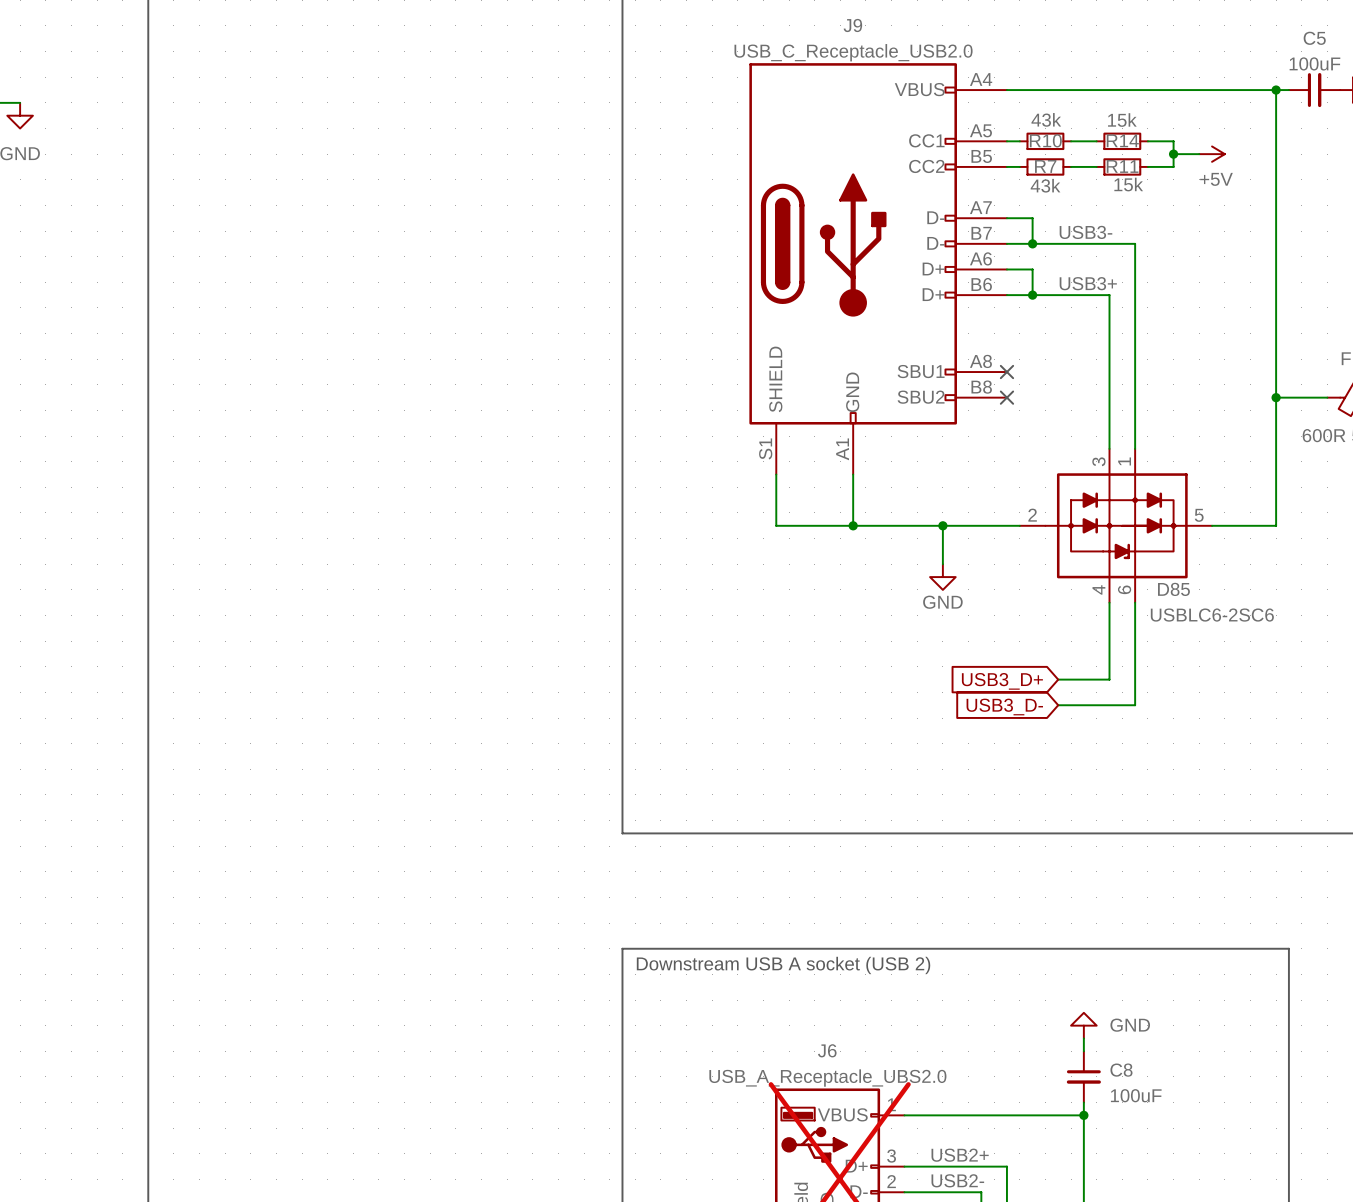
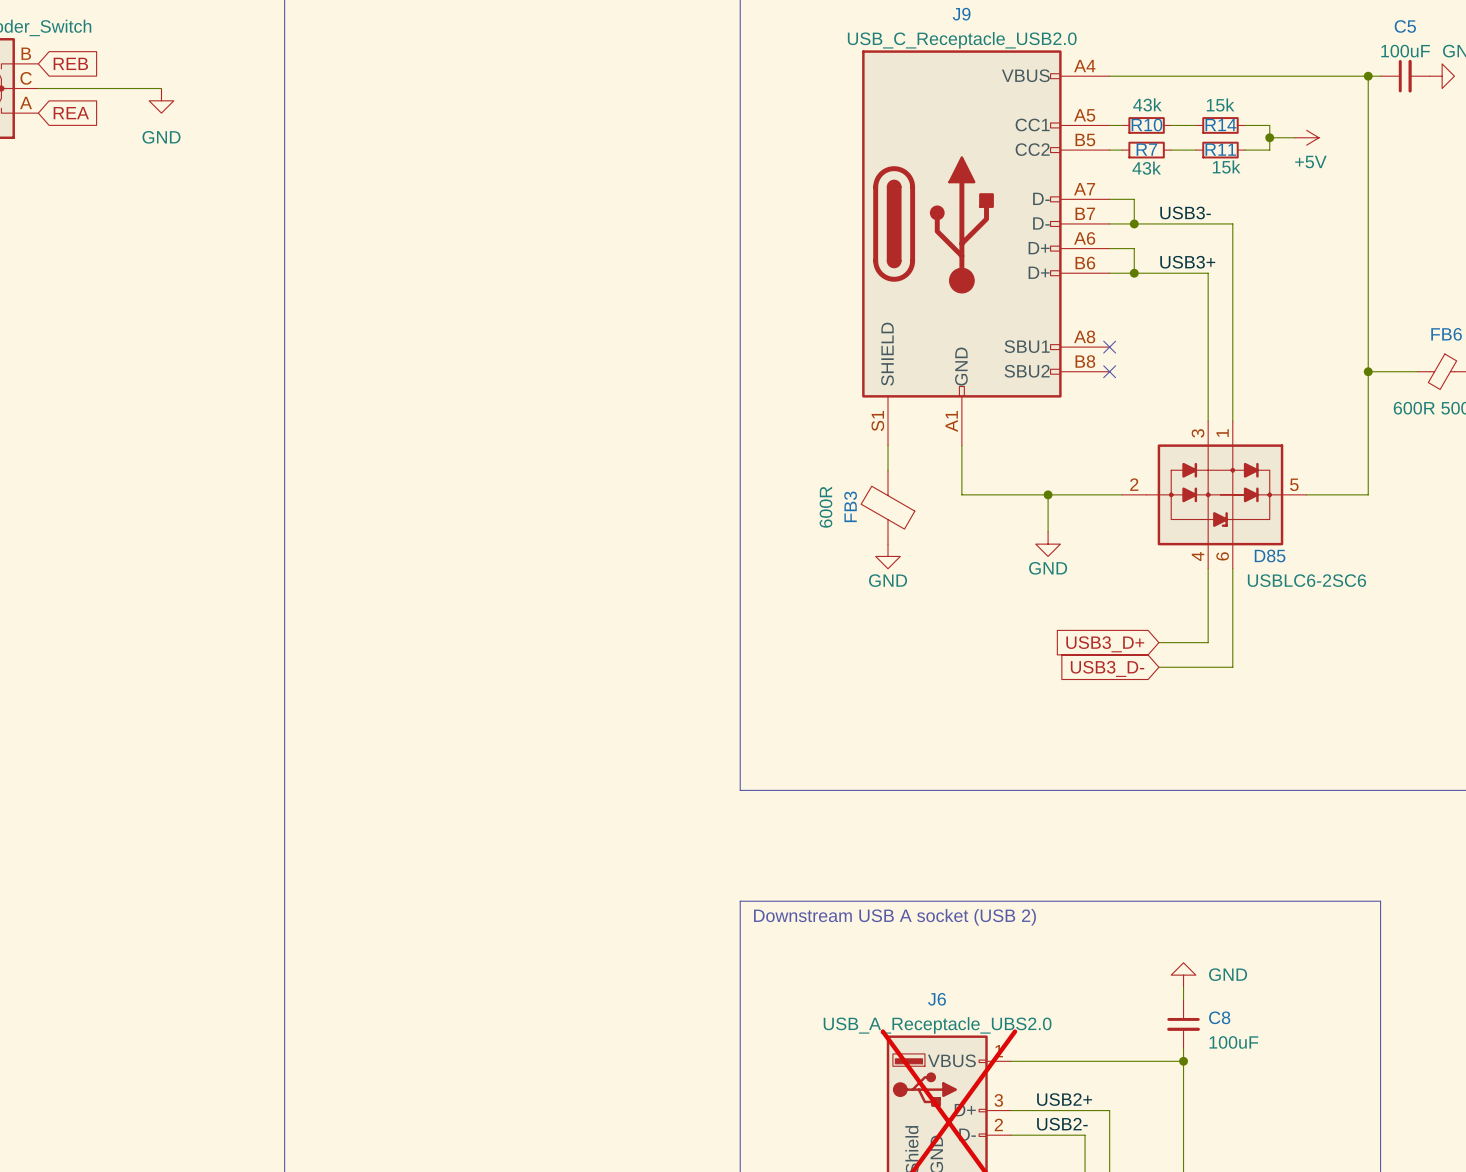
wire: (776, 500) (776, 525) (853, 525) -> none
junction: (853, 525) -> none
FB3: none -> 600R (888, 507)
power symbol: none -> GND (888, 556)

